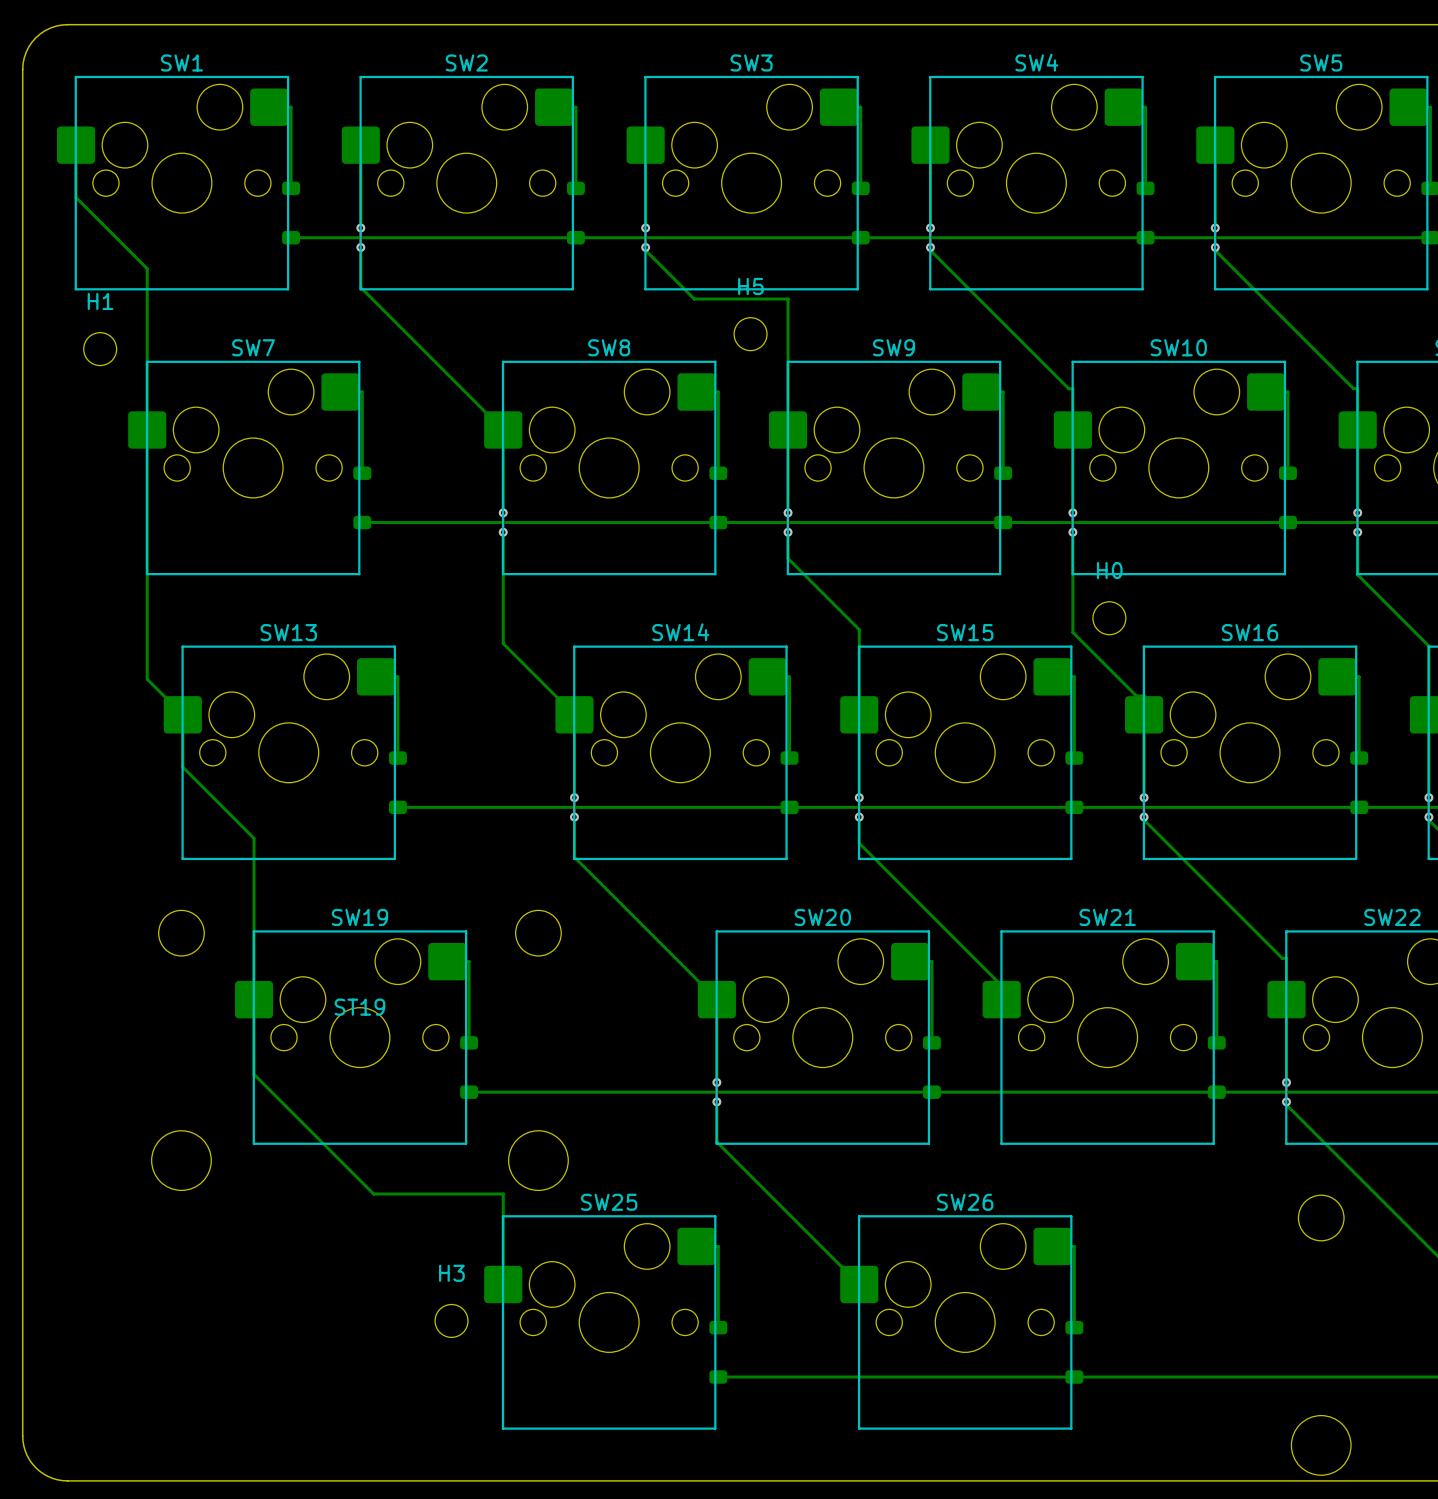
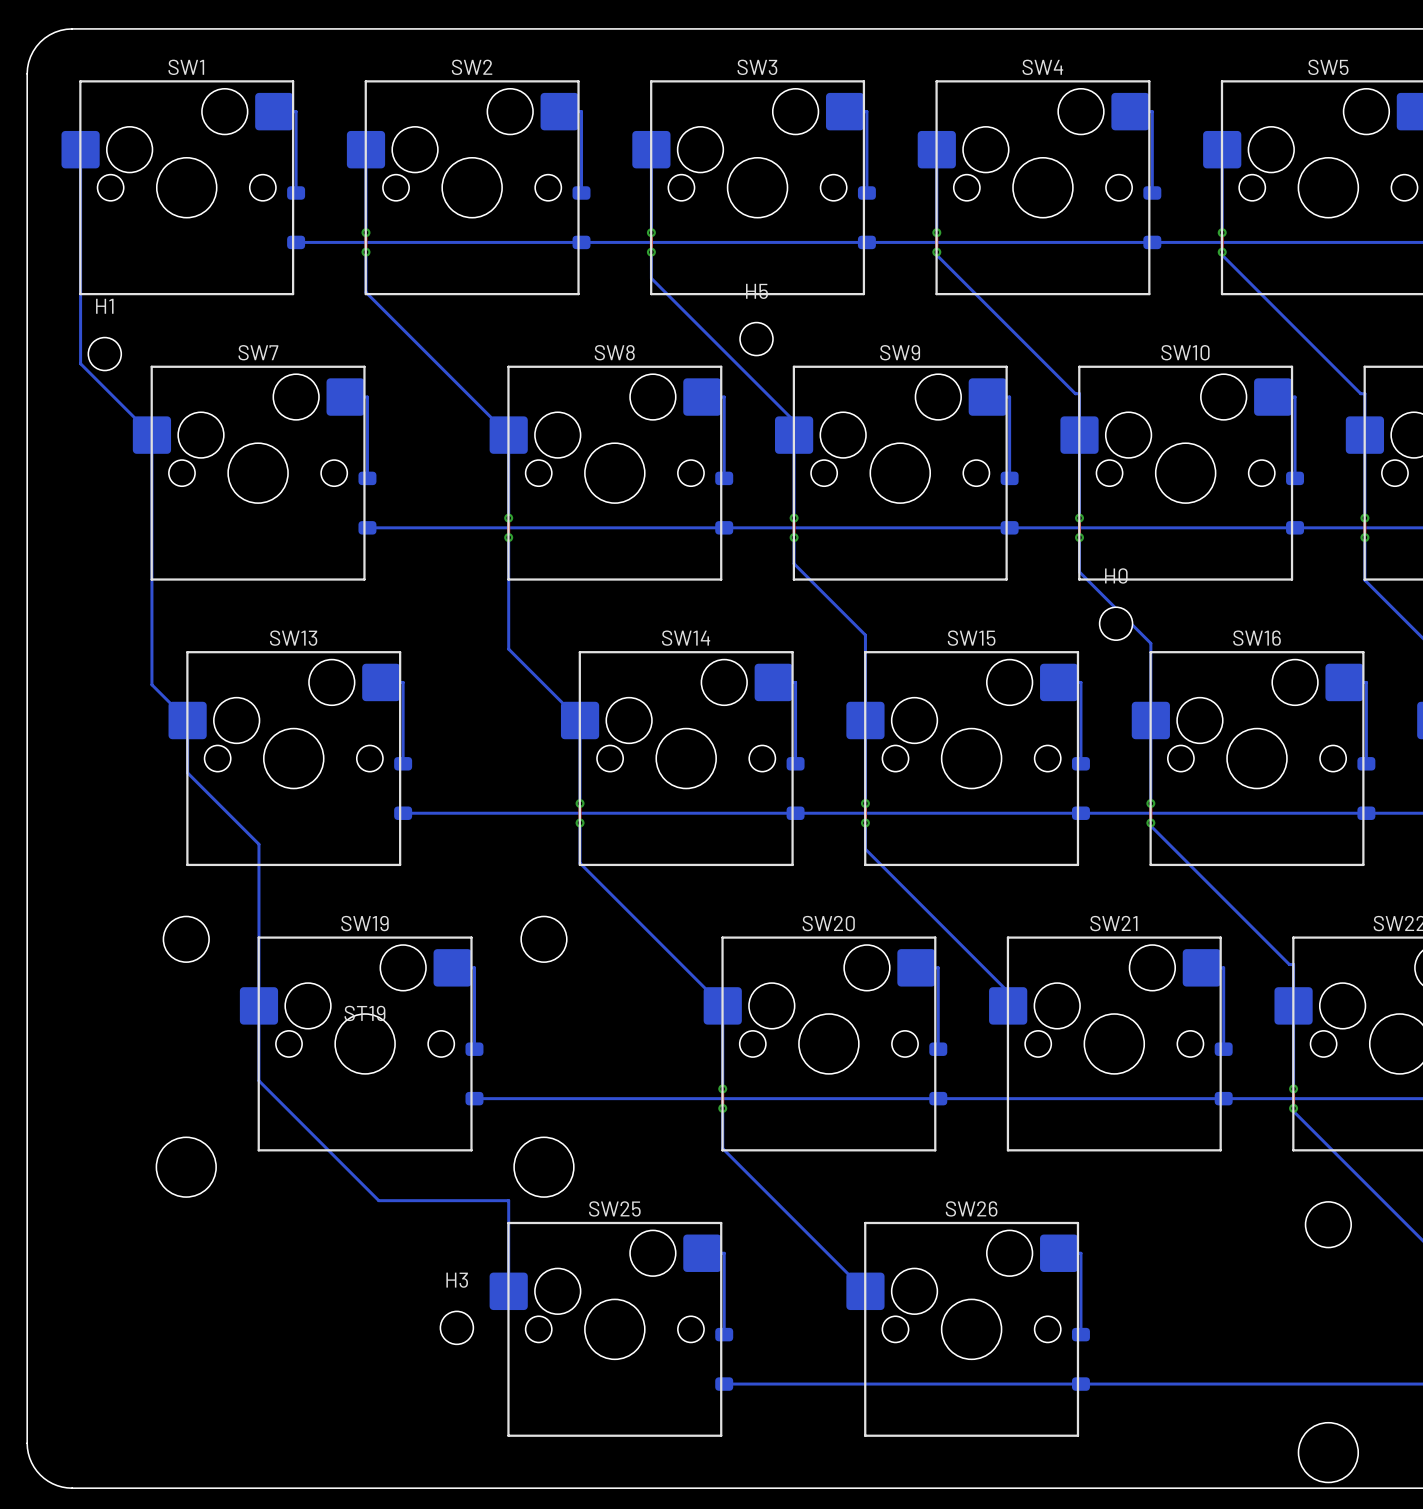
bottom track: (76, 197) (147, 268) (147, 429) -> (80, 202) (80, 363) (151, 435)
bottom track: (645, 250) (694, 299) (788, 299) (788, 416) -> (651, 255) (651, 278) (794, 421)
bottom track: (1072, 566) (1072, 632) (1136, 695) (1144, 695) -> (1079, 572) (1150, 643) (1150, 701)

